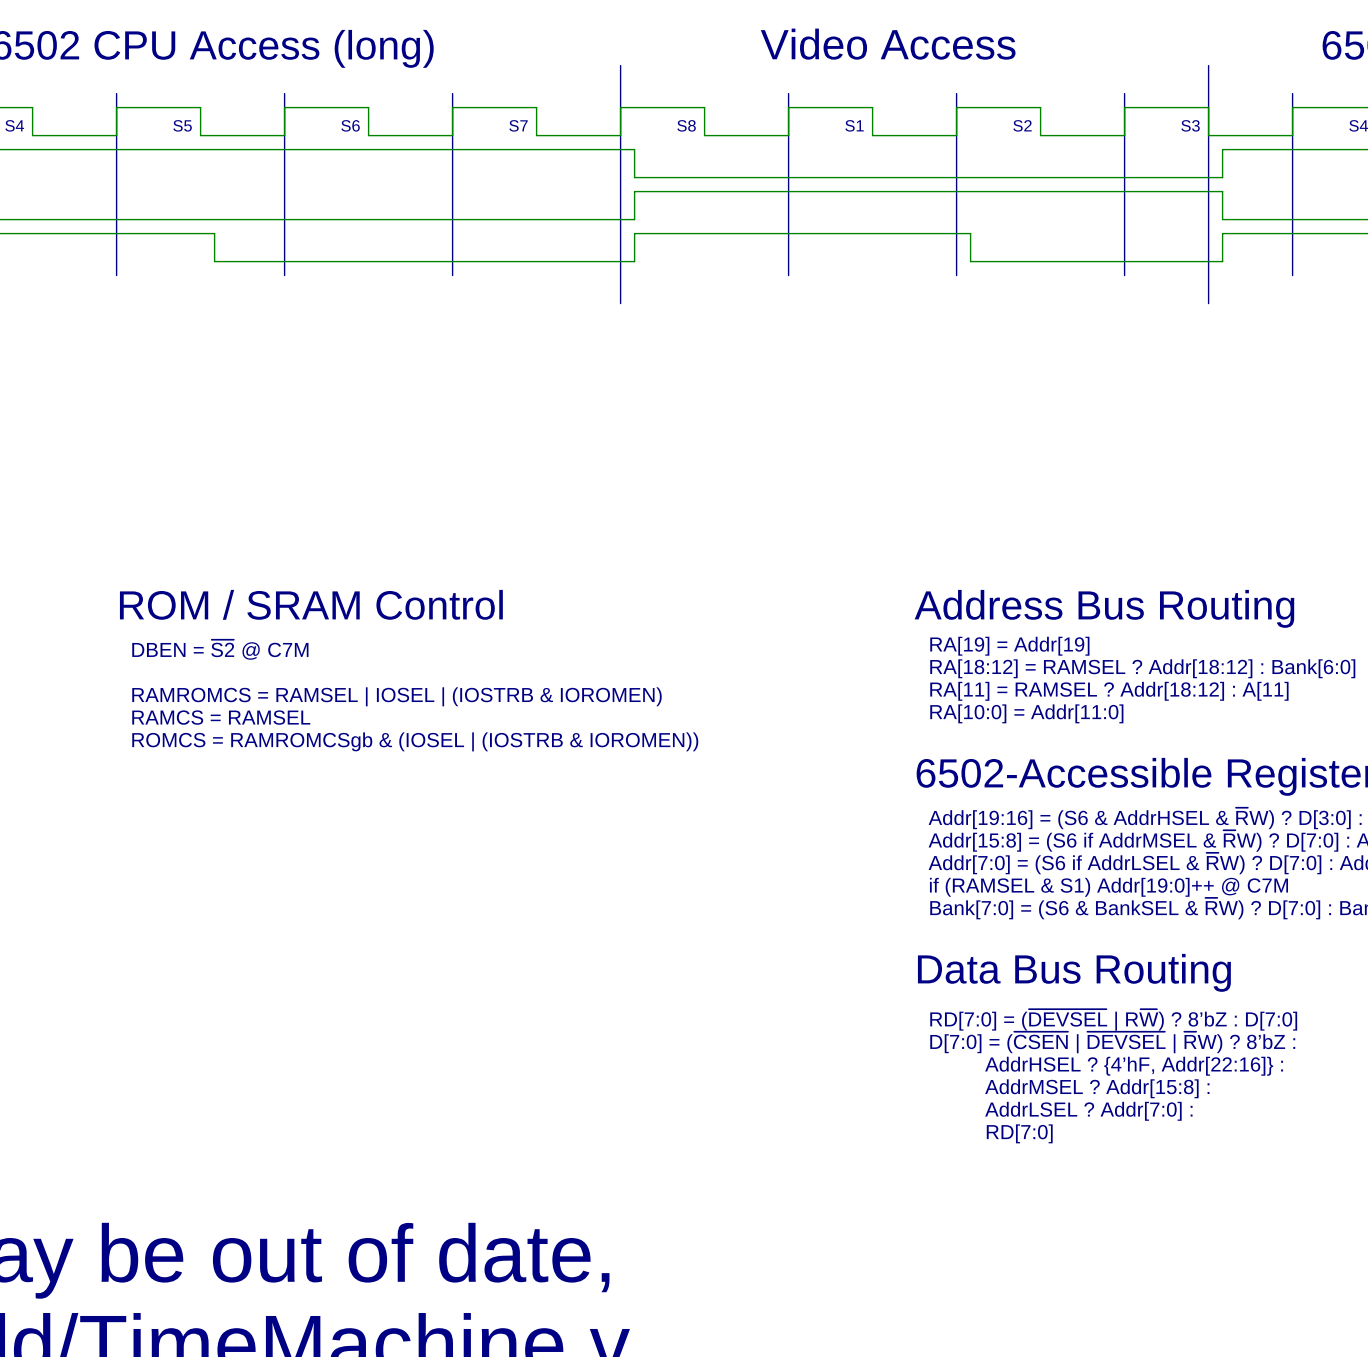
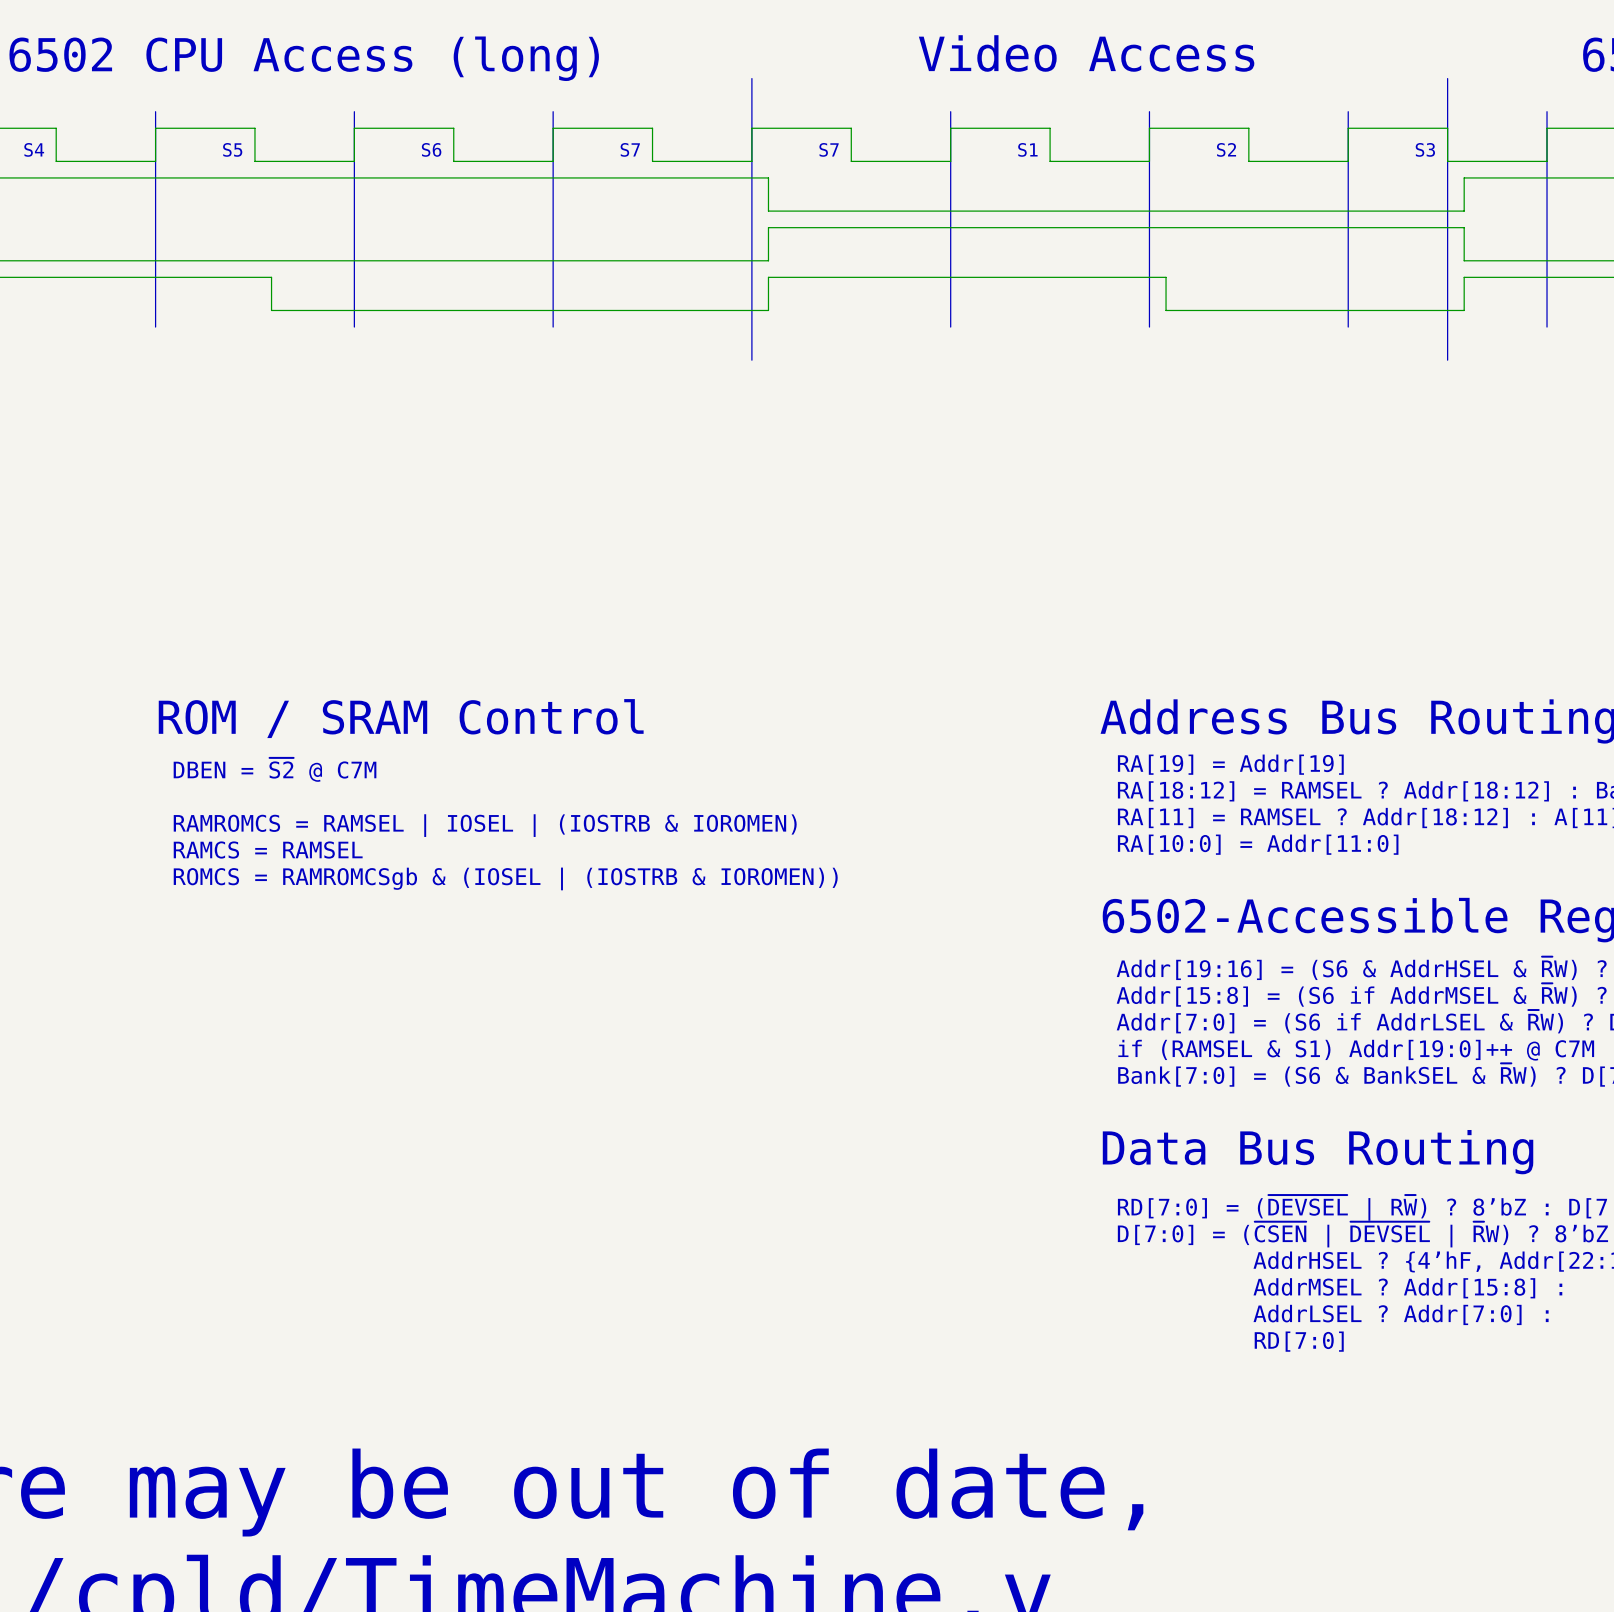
text: S8 (686, 125) -> S7 (829, 149)

